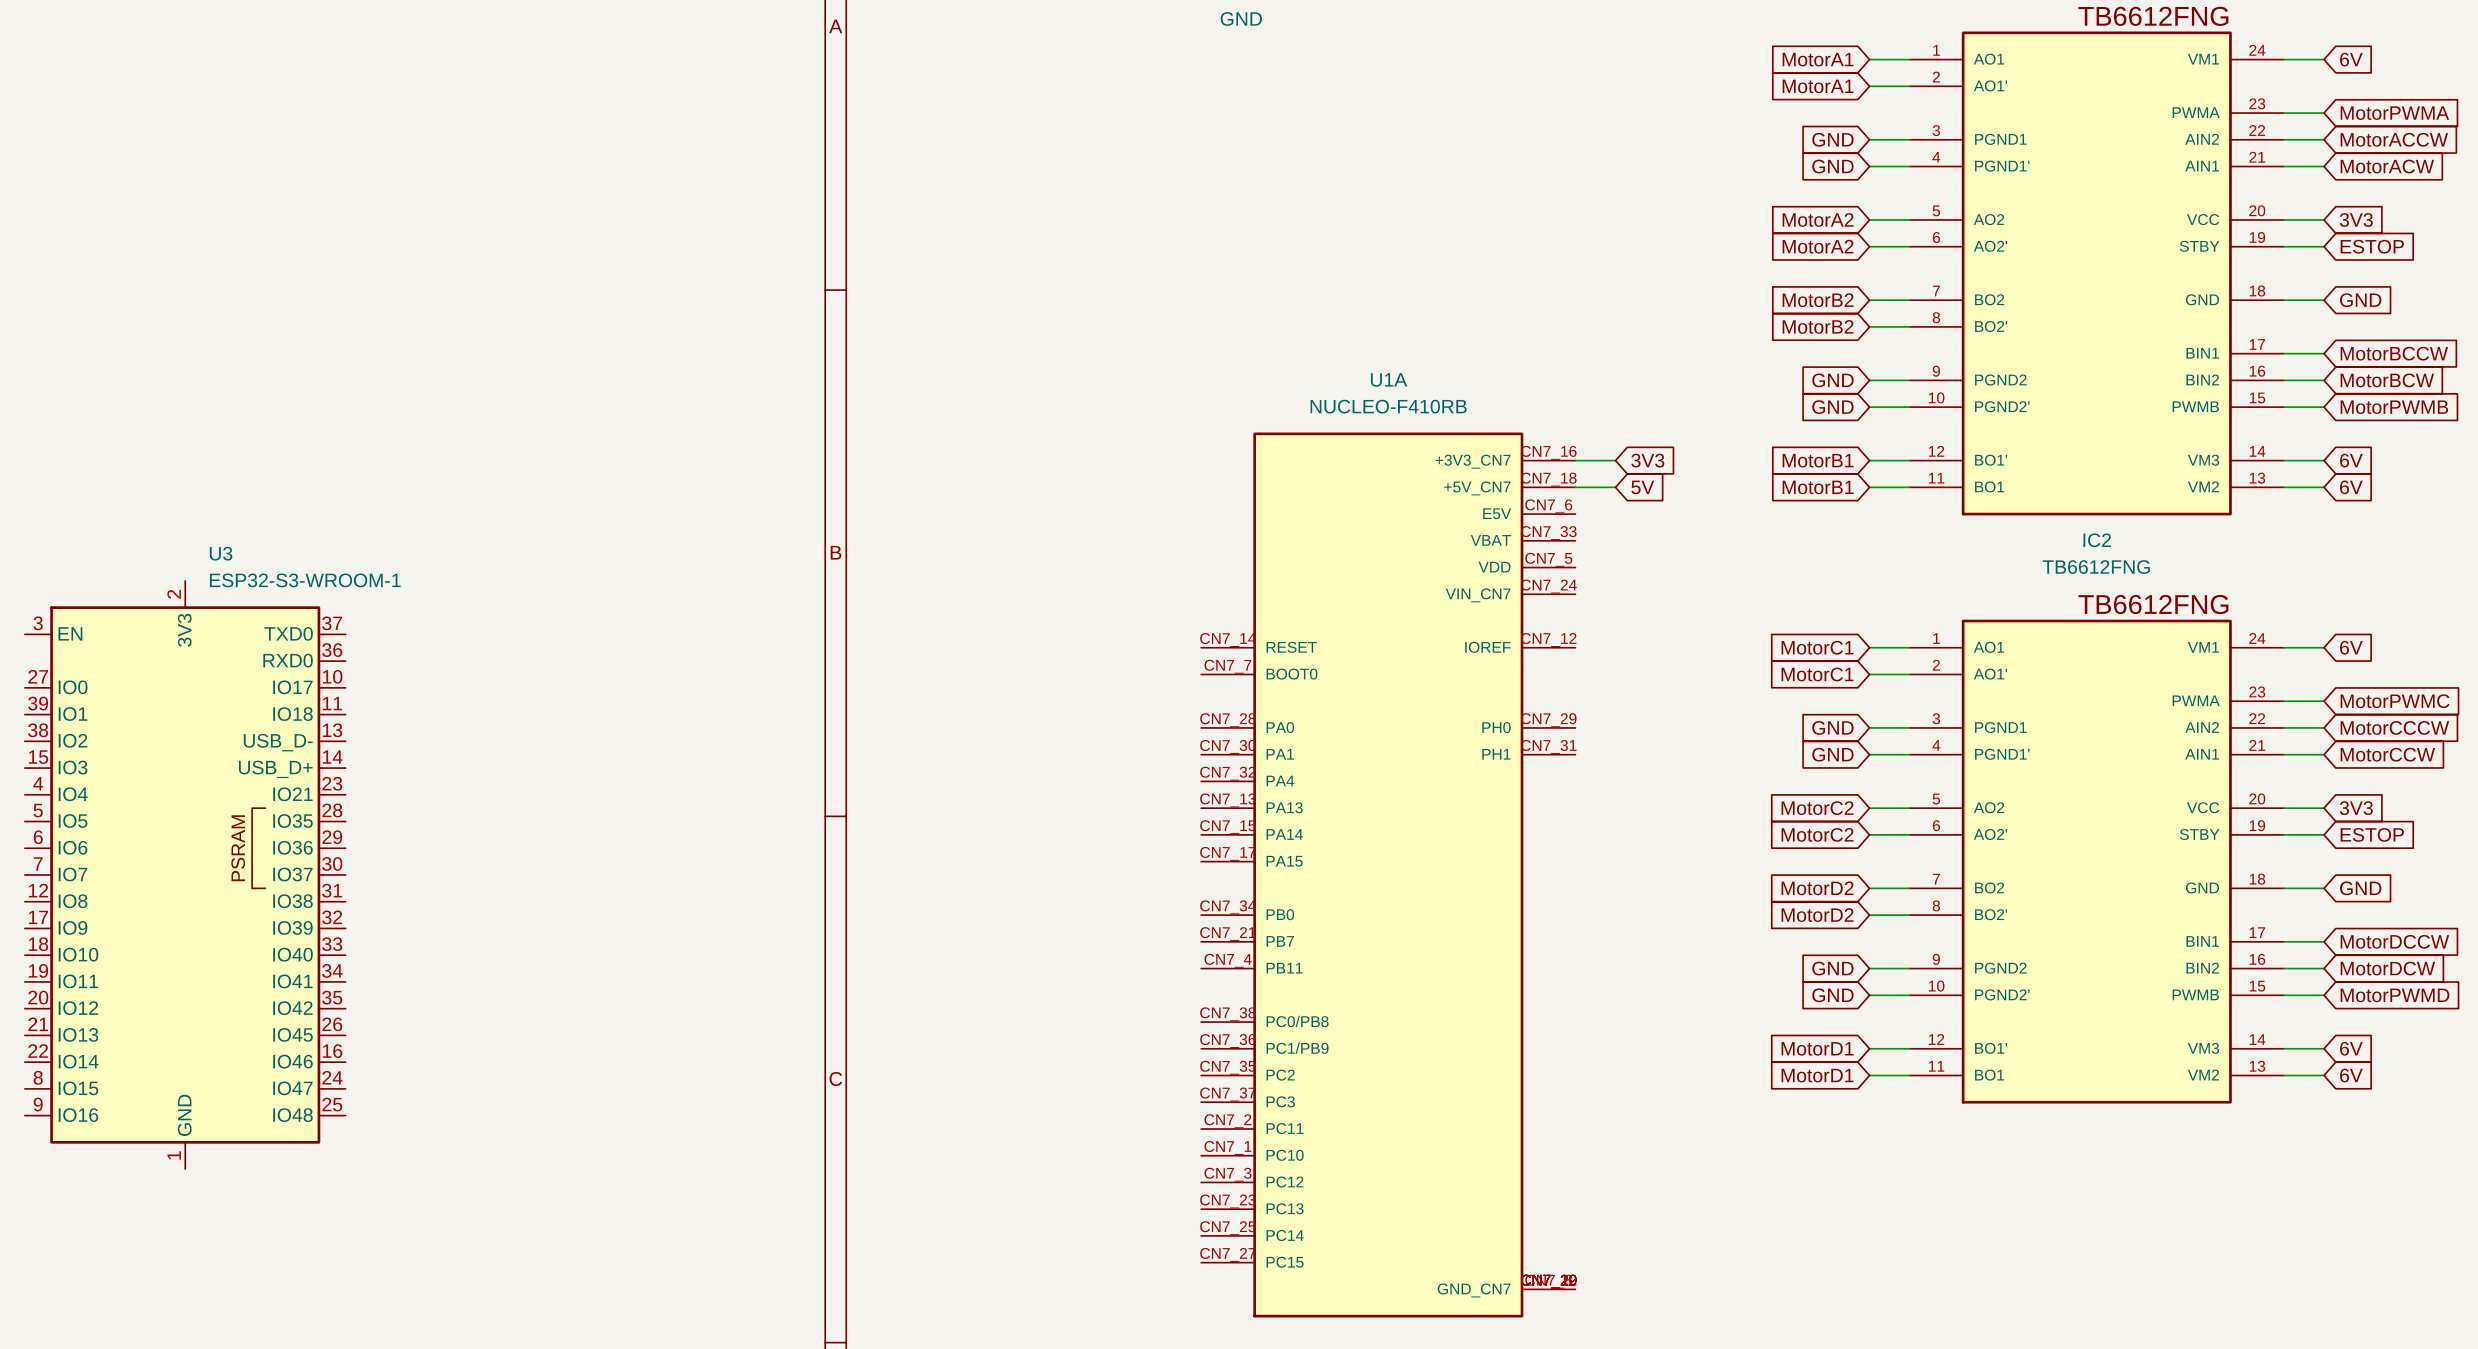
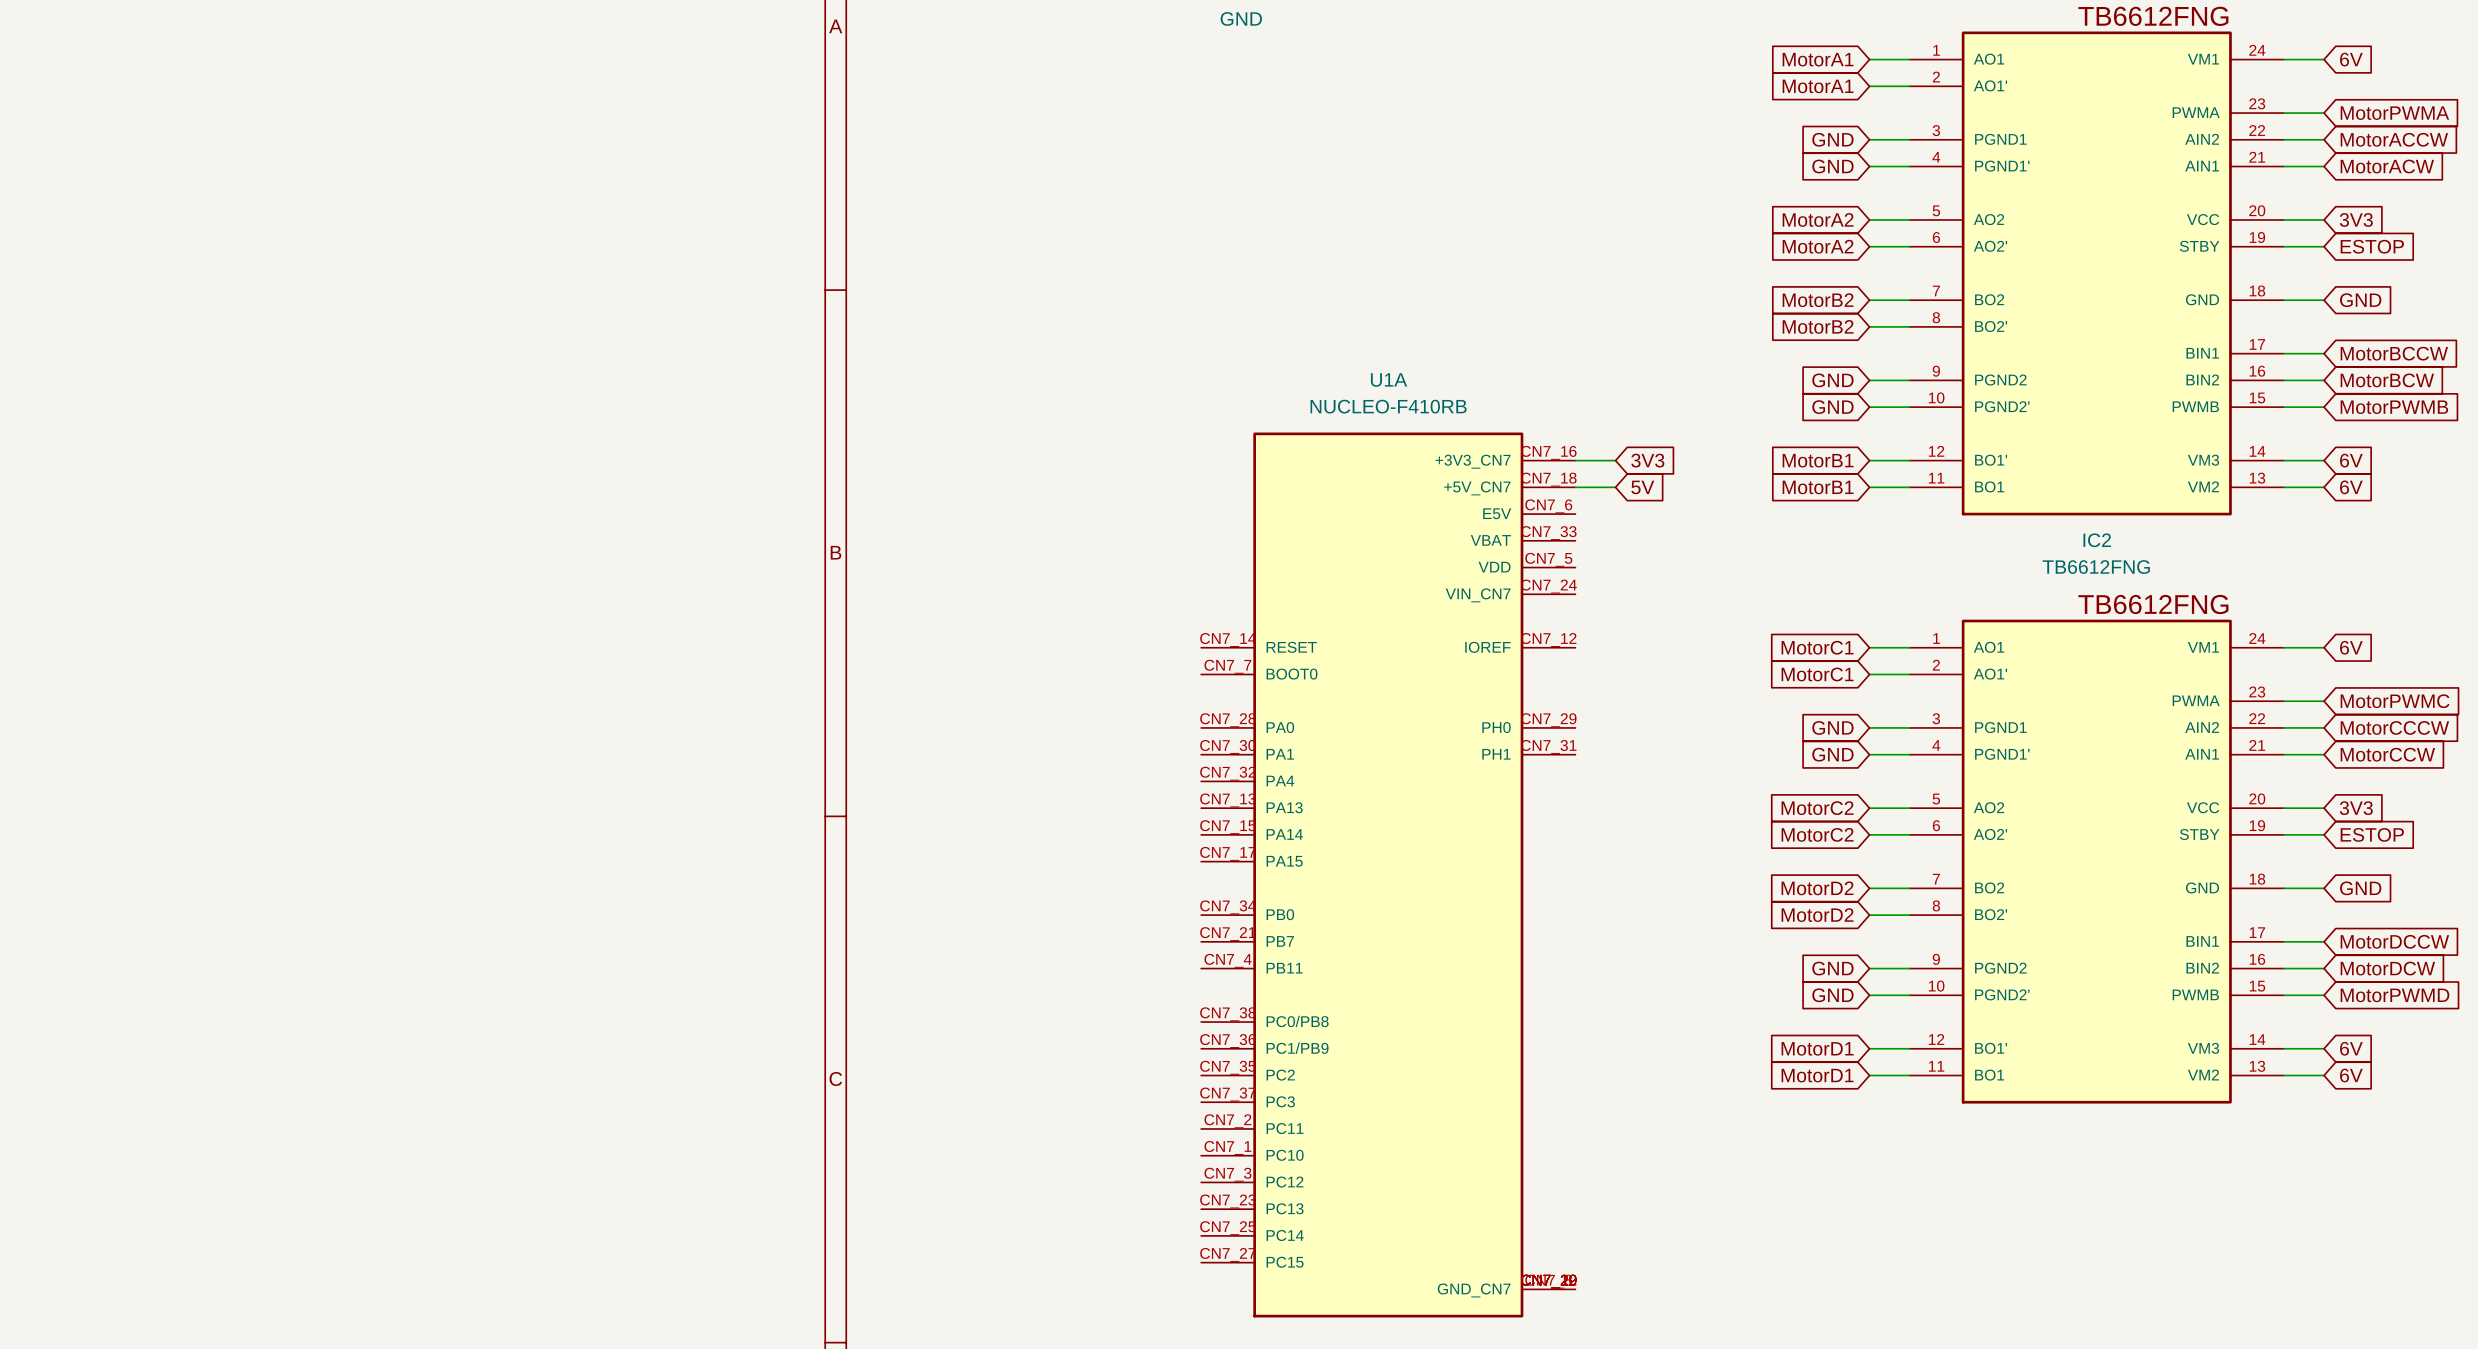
U3: ESP32-S3-WROOM-1 (185, 874) -> none

